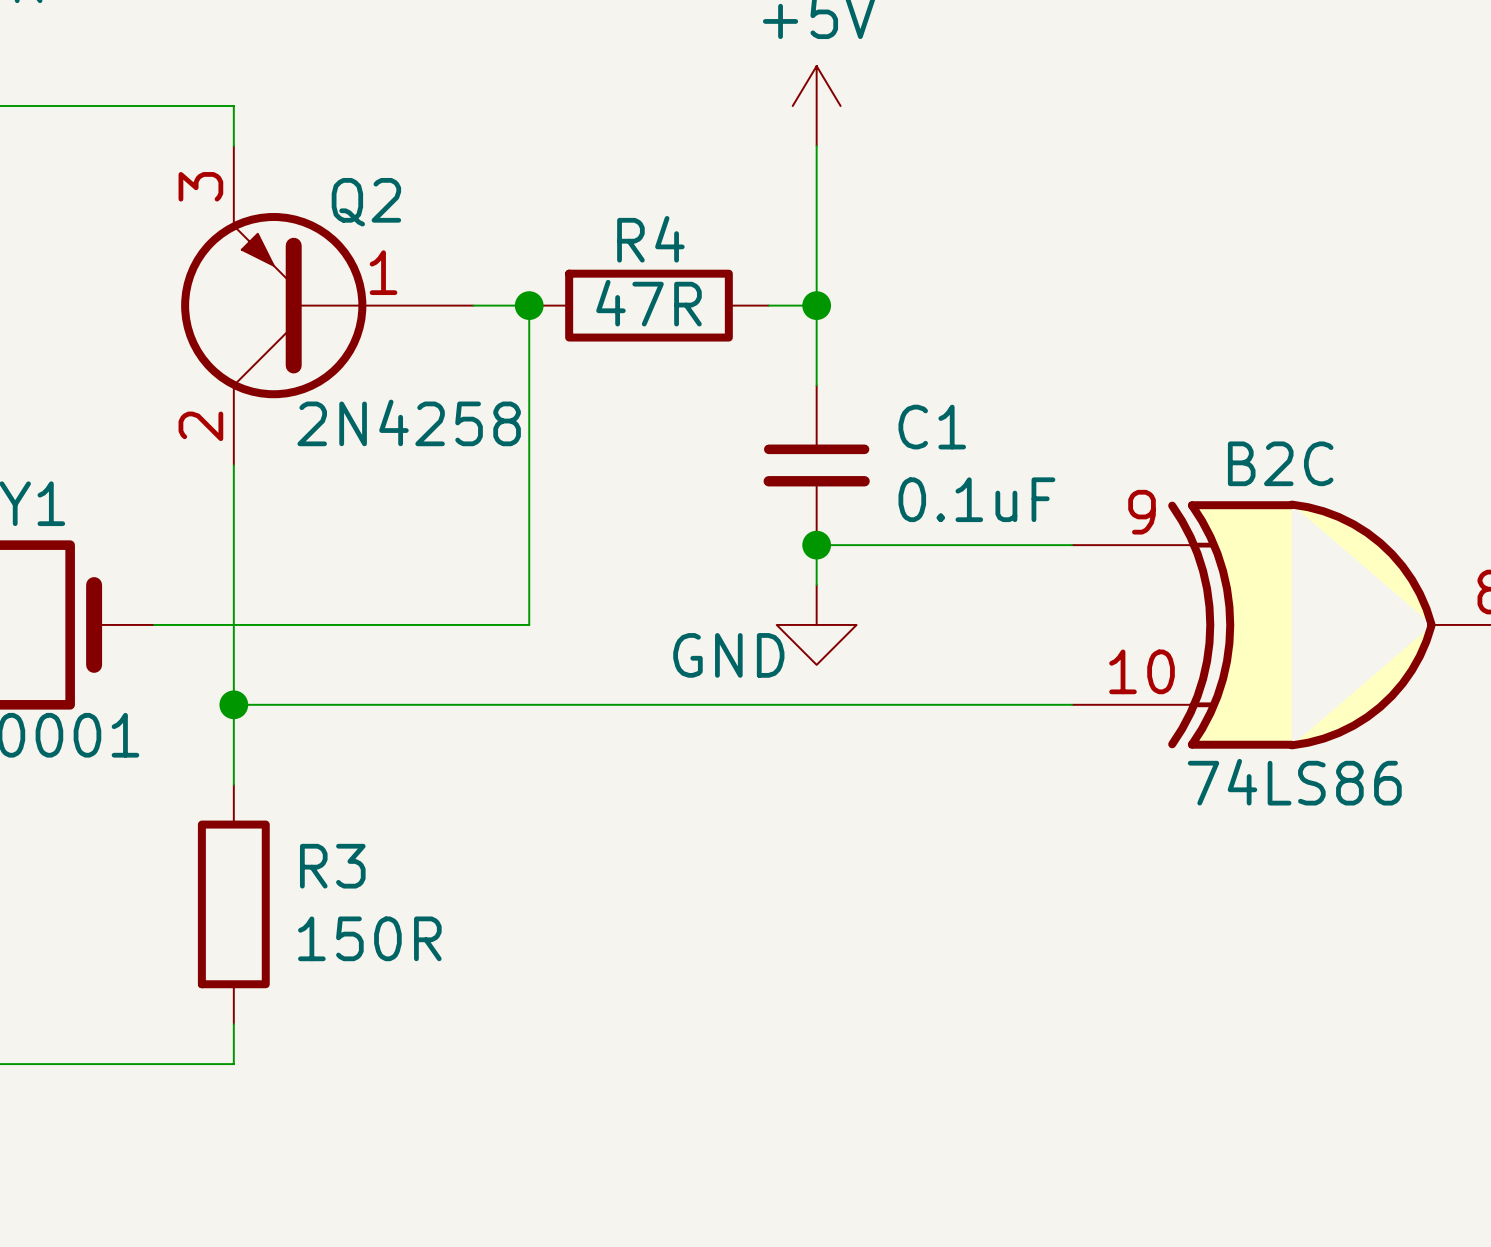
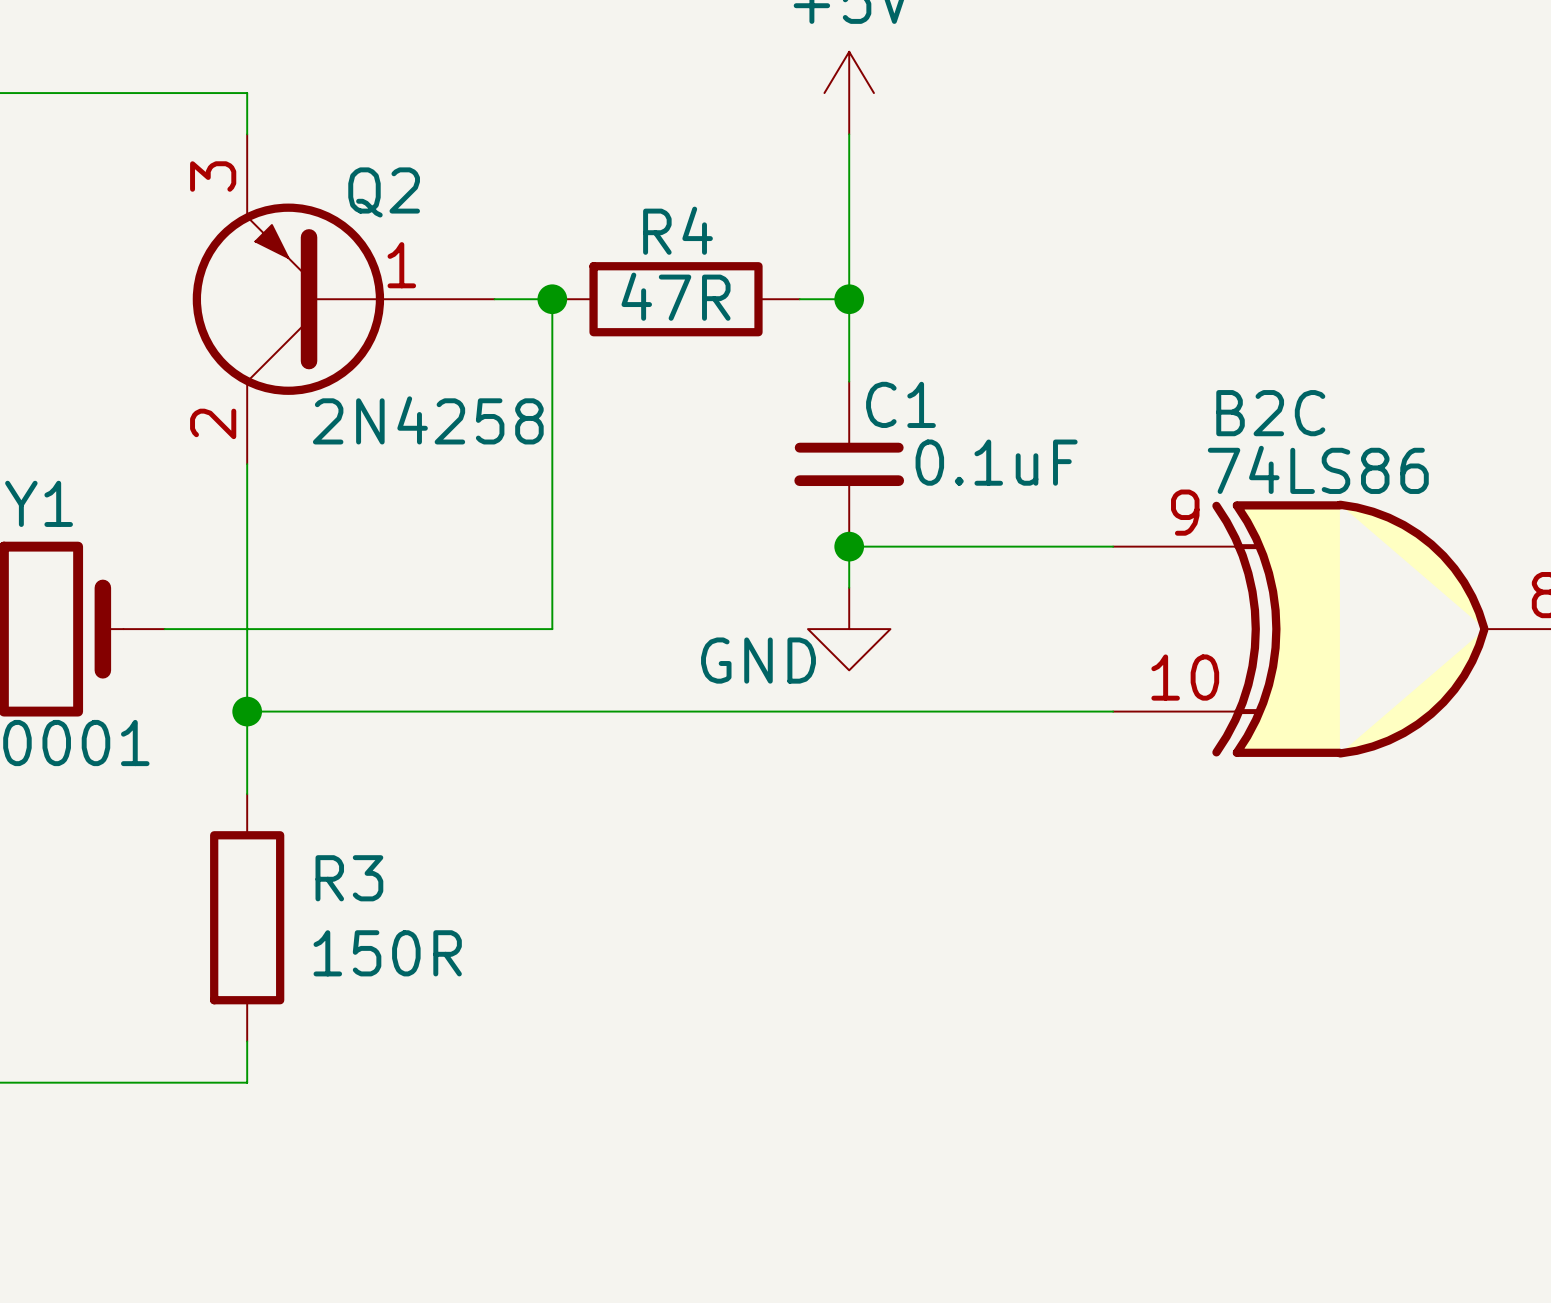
C1 name position: C1 (932, 427) -> C1 (900, 404)
B2C name position: B2C (1280, 463) -> B2C (1270, 413)
C1 value position: 0.1uF (976, 499) -> 0.1uF (996, 462)
B2C value position: 74LS86 (1294, 782) -> 74LS86 (1318, 469)

